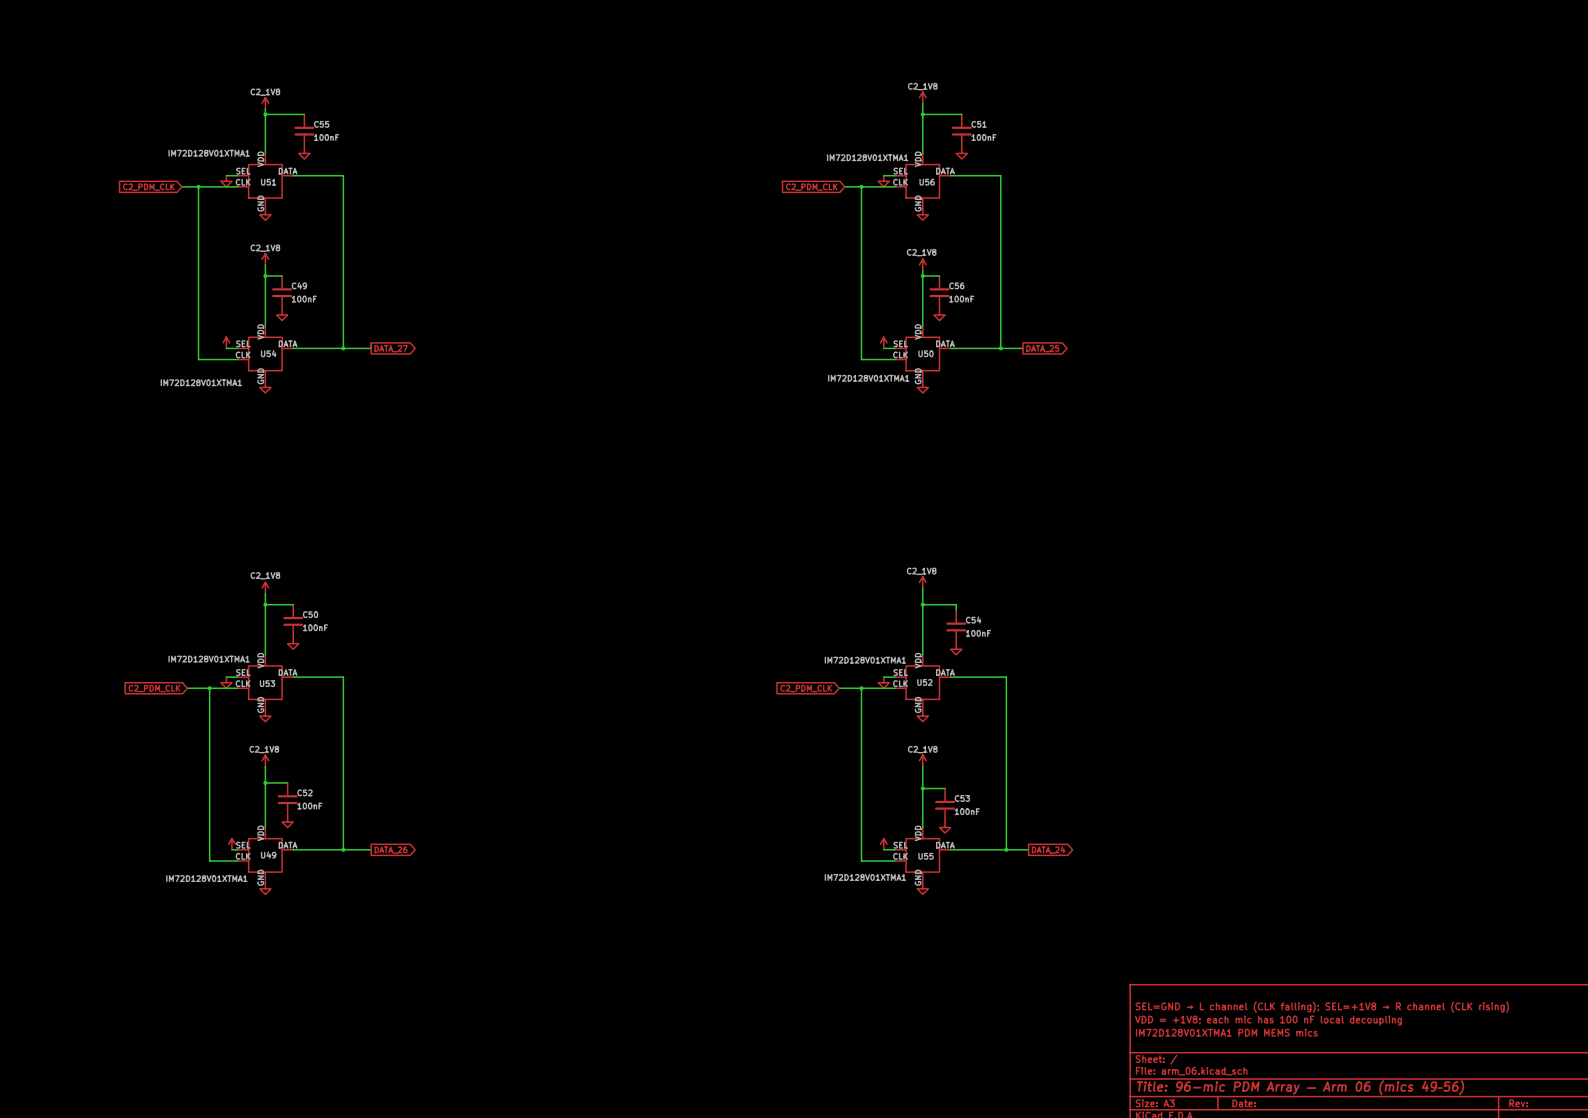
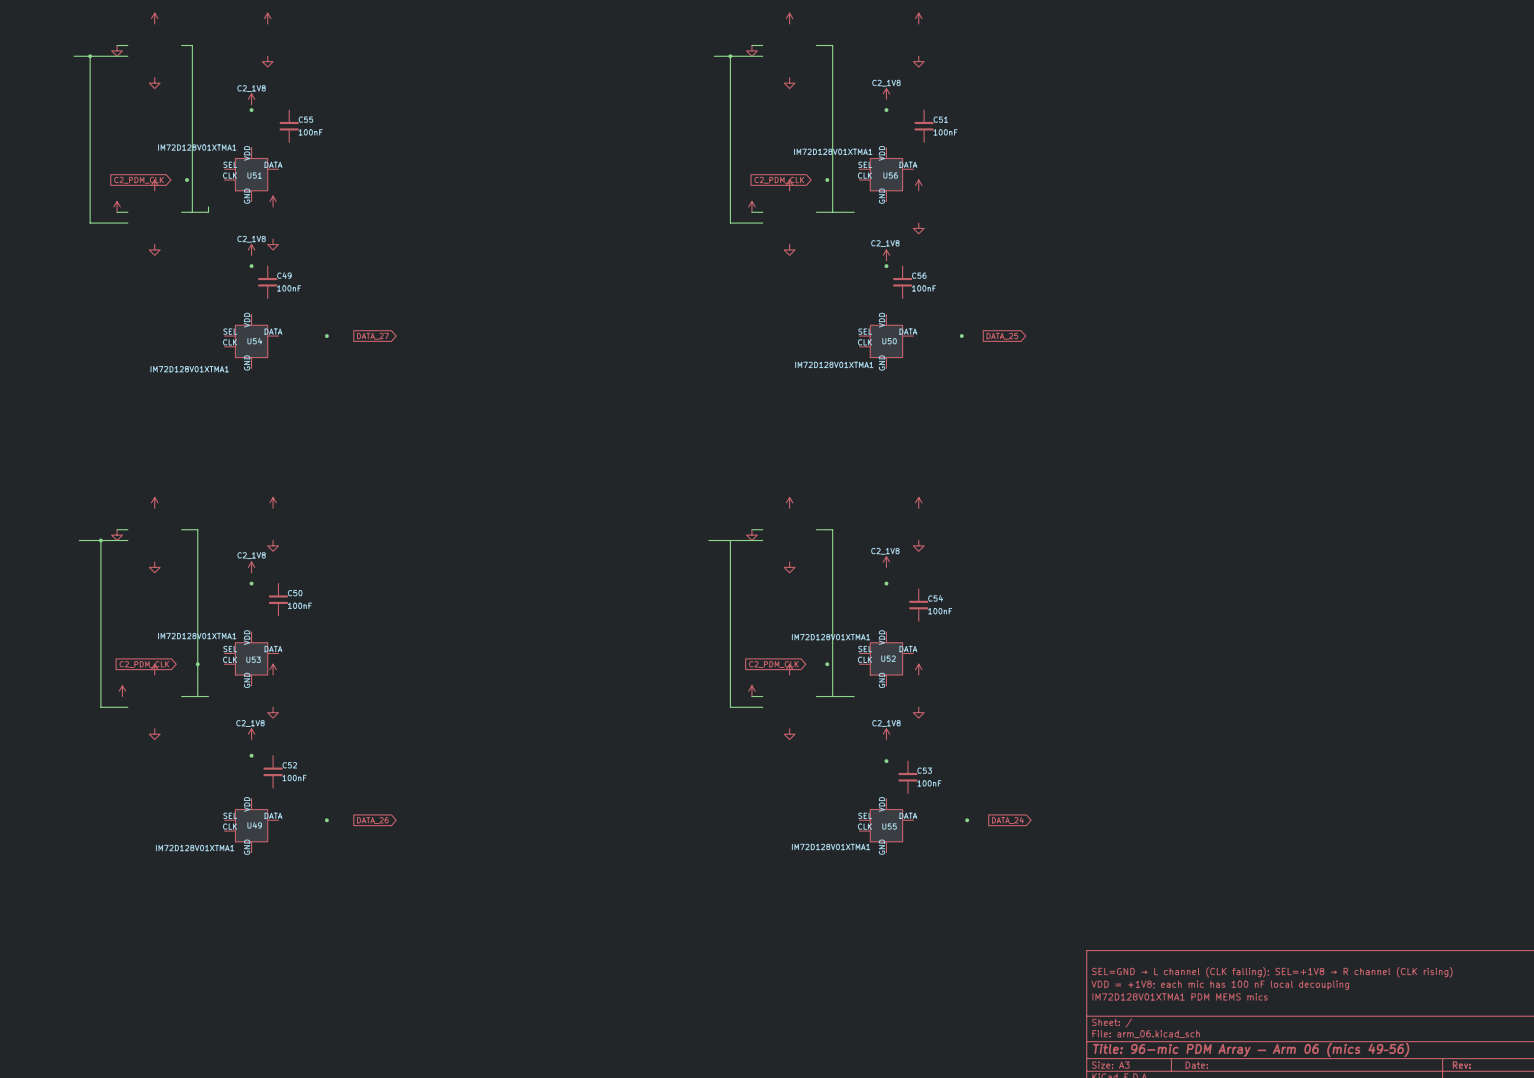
power symbol: none -> (154, 18)
power symbol: none -> (267, 18)
power symbol: none -> (789, 18)
power symbol: none -> (918, 18)
wire: none -> (117, 45) (127, 45)
wire: none -> (181, 45) (192, 45) (192, 212)
wire: none -> (751, 45) (762, 45)
wire: none -> (816, 45) (832, 45) (832, 212)
power symbol: none -> (117, 50)
power symbol: none -> (751, 50)
wire: none -> (74, 56) (127, 56)
wire: none -> (90, 56) (90, 223) (127, 223)
junction: none -> (90, 56)
wire: none -> (714, 56) (762, 56)
wire: none -> (730, 56) (730, 223) (762, 223)
junction: none -> (730, 56)
power symbol: none -> (267, 61)
power symbol: none -> (918, 61)
power symbol: none -> (154, 83)
power symbol: none -> (789, 83)
wire: (922, 103) (922, 153) -> none
wire: (265, 108) (265, 153) -> none
wire: (265, 114) (304, 114) -> none
wire: (922, 114) (961, 114) -> none
power symbol: (304, 153) -> none
power symbol: (961, 153) -> none
wire: (226, 175) (237, 175) -> none
wire: (293, 175) (343, 175) (343, 348) -> none
wire: (883, 175) (894, 175) -> none
wire: (950, 175) (1000, 175) (1000, 348) -> none
power symbol: (226, 181) -> none
power symbol: (883, 181) -> none
wire: (181, 186) (237, 186) -> none
wire: (198, 186) (198, 359) (237, 359) -> none
wire: (844, 186) (894, 186) -> none
wire: (861, 186) (861, 359) (894, 359) -> none
power symbol: none -> (154, 185)
power symbol: none -> (789, 185)
power symbol: none -> (918, 185)
power symbol: none -> (273, 201)
power symbol: none -> (117, 206)
wire: none -> (208, 206) (208, 212) (181, 212)
power symbol: (265, 214) -> none
power symbol: none -> (751, 206)
power symbol: (922, 214) -> none
wire: none -> (117, 212) (127, 212)
wire: none -> (751, 212) (762, 212)
wire: none -> (816, 212) (854, 212)
power symbol: none -> (918, 228)
power symbol: none -> (273, 244)
power symbol: none -> (154, 249)
power symbol: none -> (789, 249)
wire: (265, 264) (265, 326) -> none
wire: (922, 270) (922, 326) -> none
wire: (265, 275) (282, 275) -> none
wire: (922, 275) (939, 275) -> none
power symbol: (282, 314) -> none
power symbol: (939, 314) -> none
power symbol: (226, 342) -> none
wire: (371, 342) (371, 348) (293, 348) -> none
power symbol: (883, 342) -> none
wire: (226, 348) (237, 348) -> none
wire: (883, 348) (894, 348) -> none
wire: (950, 348) (1023, 348) -> none
power symbol: (265, 387) -> none
power symbol: (922, 387) -> none
power symbol: none -> (154, 502)
power symbol: none -> (273, 502)
power symbol: none -> (789, 502)
power symbol: none -> (918, 502)
wire: none -> (117, 529) (127, 529)
wire: none -> (181, 529) (197, 529) (197, 664)
wire: none -> (751, 529) (762, 529)
wire: none -> (816, 529) (832, 529) (832, 696)
power symbol: none -> (117, 535)
power symbol: none -> (751, 535)
wire: none -> (79, 540) (127, 540)
wire: none -> (100, 540) (100, 707) (127, 707)
junction: none -> (100, 540)
wire: none -> (708, 540) (762, 540)
wire: none -> (730, 540) (730, 707) (762, 707)
power symbol: none -> (273, 545)
power symbol: none -> (918, 545)
power symbol: none -> (154, 567)
power symbol: none -> (789, 567)
wire: (922, 587) (922, 654) -> none
wire: (265, 593) (265, 654) -> none
wire: (265, 604) (293, 604) -> none
wire: (922, 604) (956, 604) (956, 610) -> none
power symbol: (293, 643) -> none
power symbol: (956, 649) -> none
wire: (226, 677) (237, 677) -> none
wire: (293, 677) (343, 677) (343, 849) -> none
wire: (883, 677) (894, 677) -> none
wire: (950, 677) (1006, 677) (1006, 849) -> none
power symbol: (226, 682) -> none
power symbol: (883, 682) -> none
wire: (187, 688) (237, 688) -> none
wire: (839, 688) (894, 688) -> none
wire: (861, 688) (861, 860) (894, 860) -> none
power symbol: none -> (154, 669)
power symbol: none -> (273, 669)
power symbol: none -> (789, 669)
power symbol: none -> (918, 669)
power symbol: none -> (122, 691)
power symbol position: (265, 716) -> (273, 712)
power symbol: none -> (751, 691)
power symbol position: (922, 716) -> (918, 712)
wire: none -> (181, 696) (208, 696)
wire: (209, 721) (209, 860) (237, 860) -> none
wire: none -> (751, 696) (762, 696)
wire: none -> (816, 696) (854, 696)
power symbol: none -> (154, 734)
power symbol: none -> (789, 734)
wire: (265, 766) (265, 827) -> none
wire: (922, 766) (922, 827) -> none
wire: (265, 782) (287, 782) -> none
wire: (922, 788) (945, 788) -> none
power symbol: (287, 821) -> none
power symbol: (945, 827) -> none
power symbol: (231, 844) -> none
power symbol: (883, 844) -> none
wire: (231, 849) (237, 849) -> none
wire: (293, 849) (371, 849) -> none
wire: (883, 849) (894, 849) -> none
wire: (950, 849) (1028, 849) -> none
power symbol: (265, 888) -> none
power symbol: (922, 888) -> none

